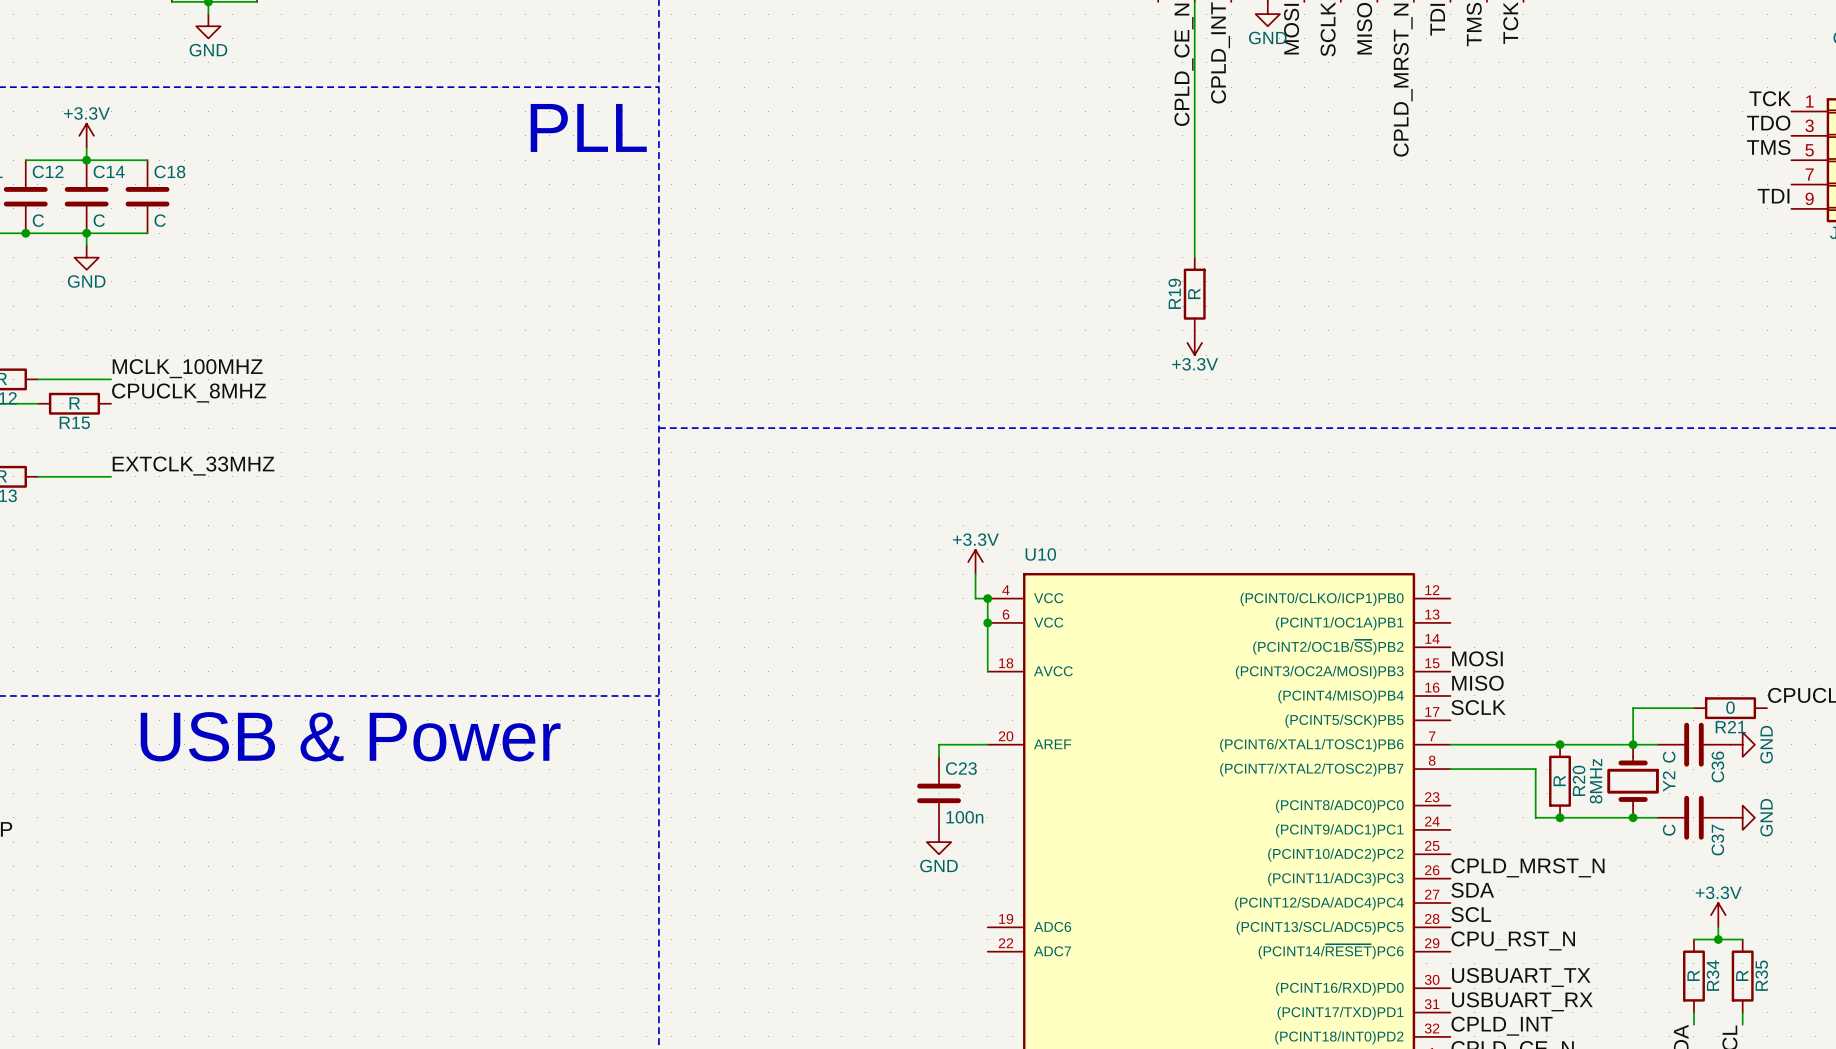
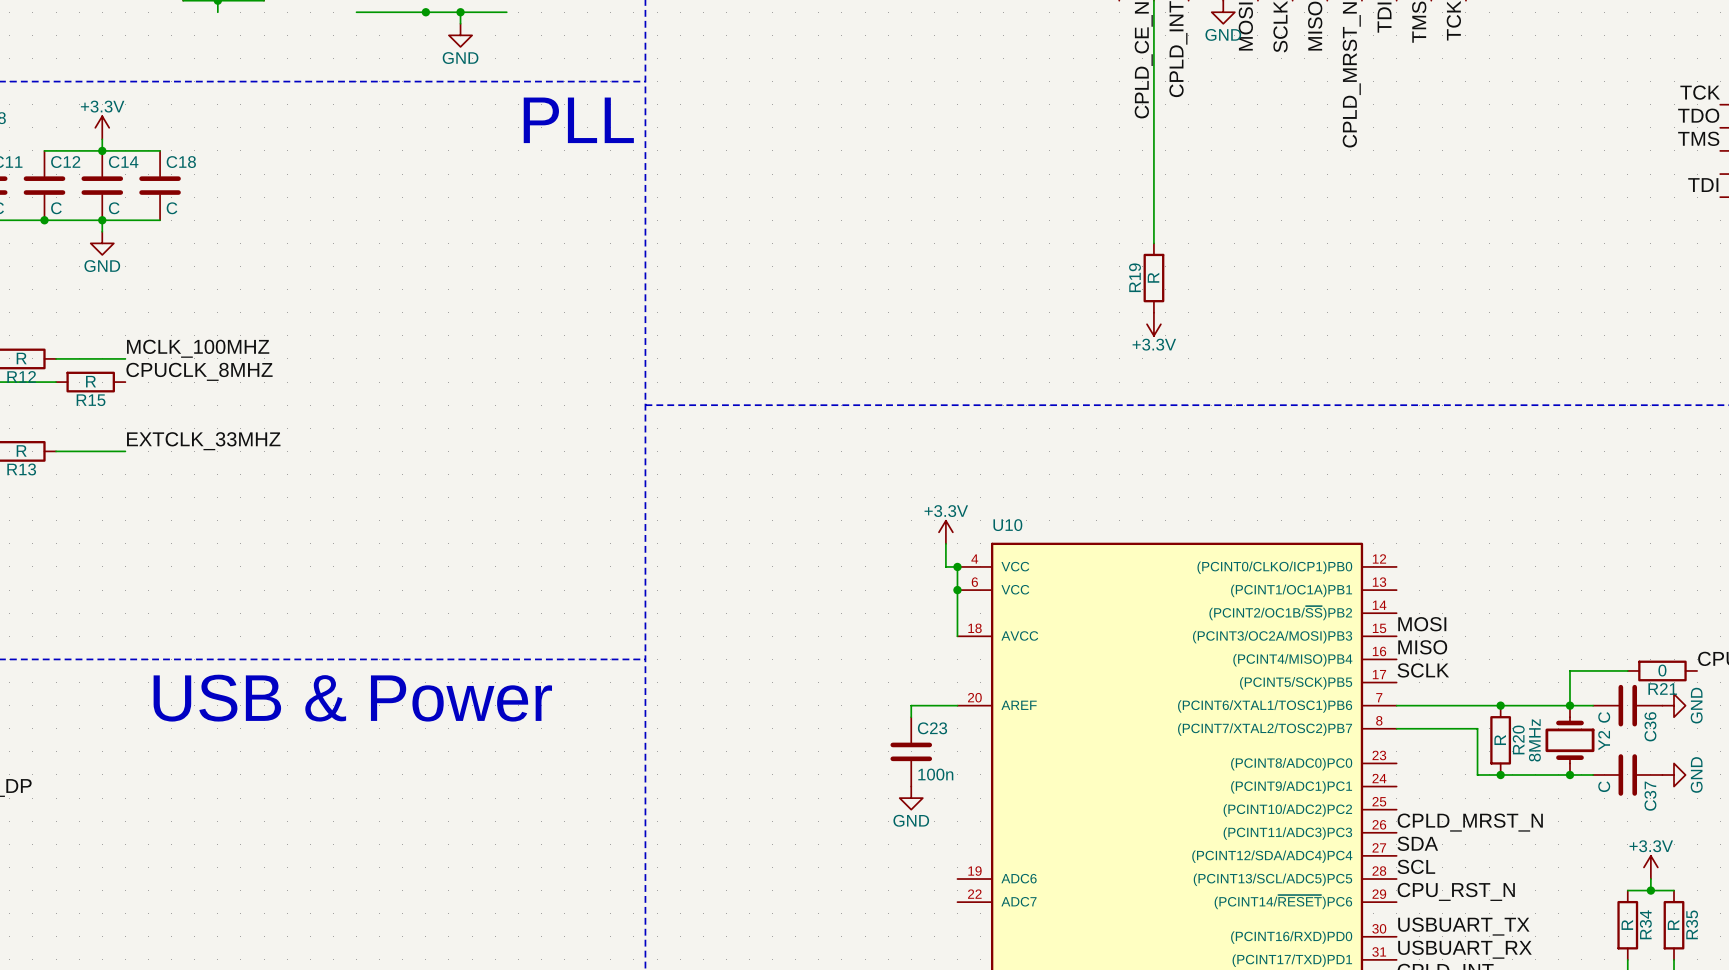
wire: none -> (356, 12) (506, 12)
junction: none -> (425, 12)
wire: none -> (460, 12) (460, 23)
junction: none -> (460, 12)
power symbol: GND (208, 26) -> none
power symbol: none -> GND (460, 35)

